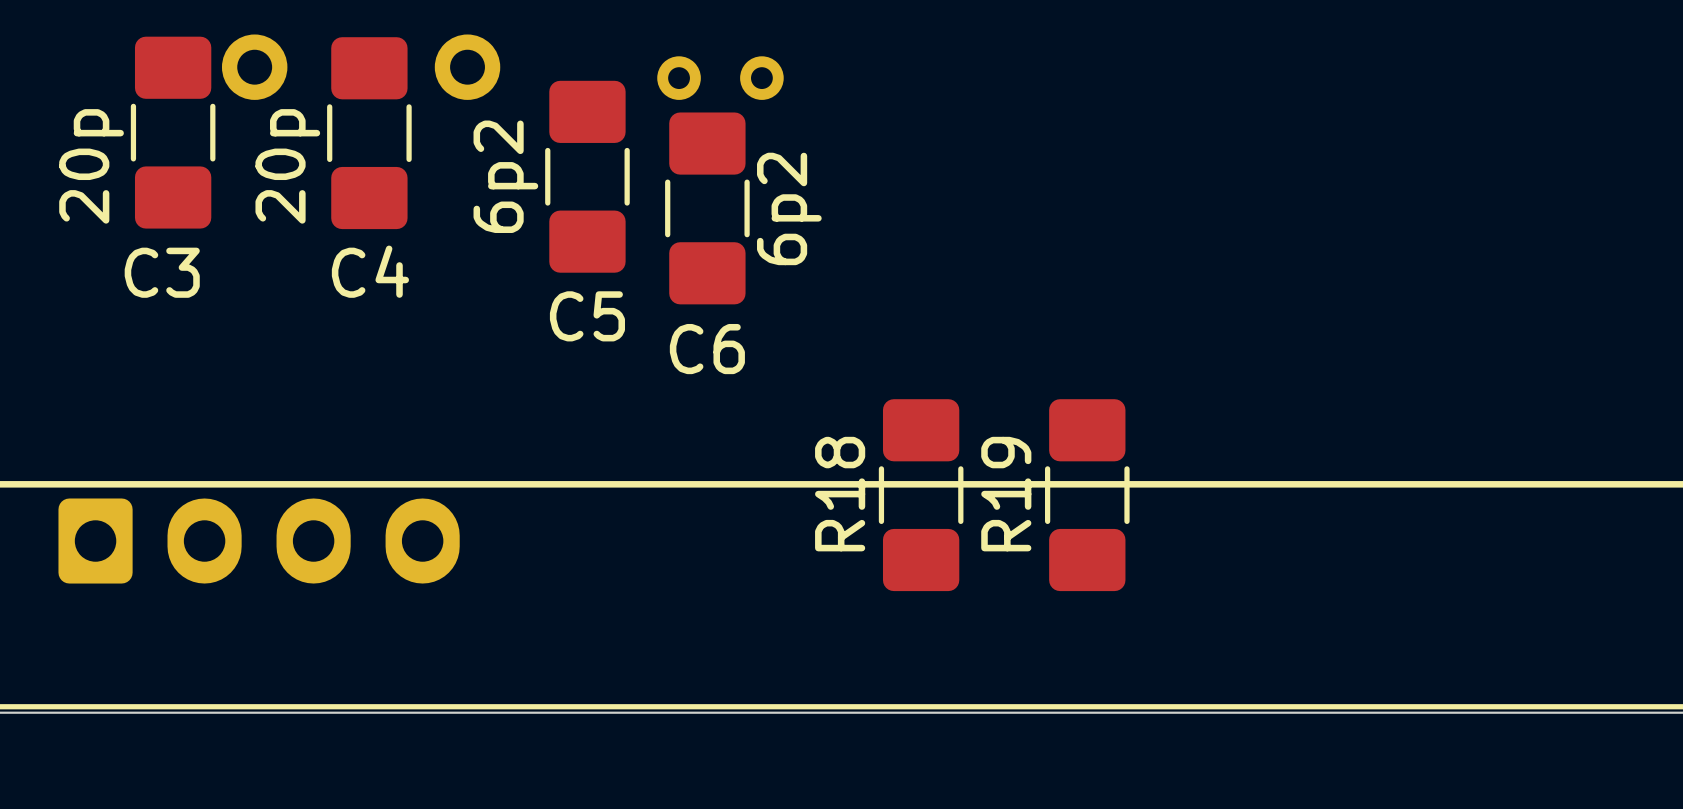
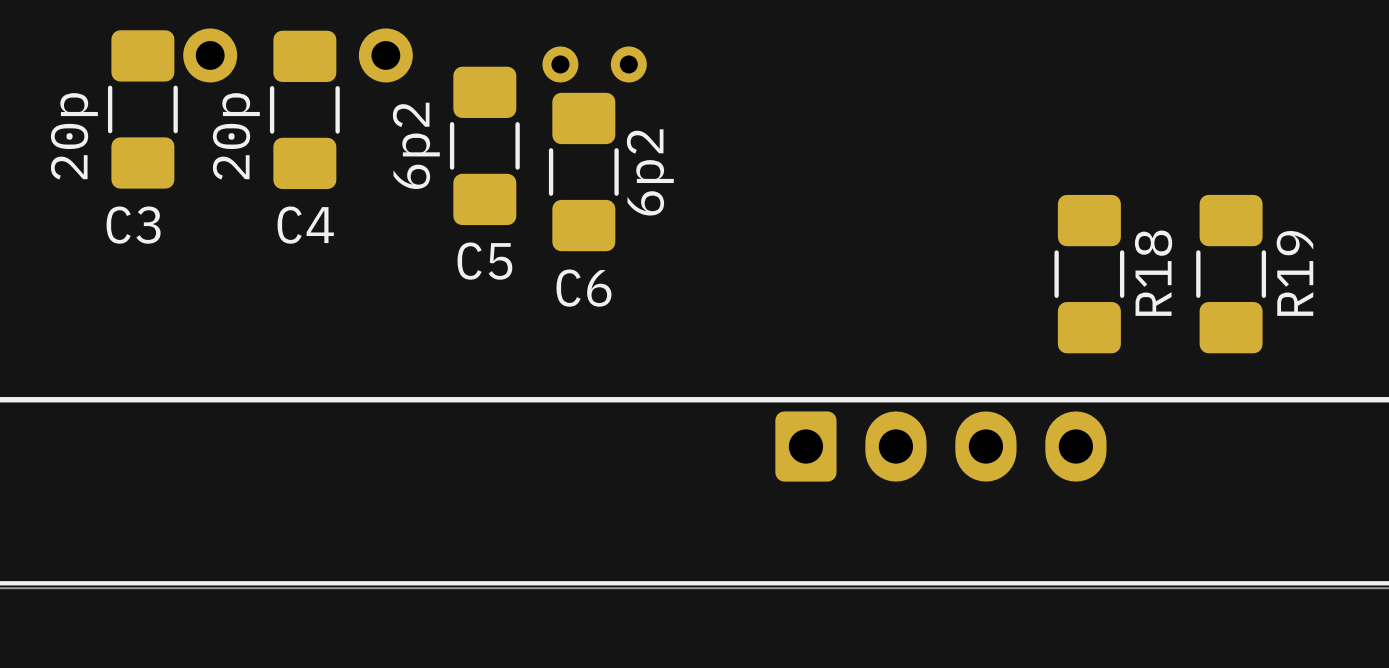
R18 name position: R18 (840, 494) -> R18 (1153, 273)
R19 name position: R19 (1006, 494) -> R19 (1294, 273)
R18 position: (921, 495) -> (1089, 274)
R19 position: (1087, 495) -> (1231, 274)
part position: (259, 541) -> (940, 446)

